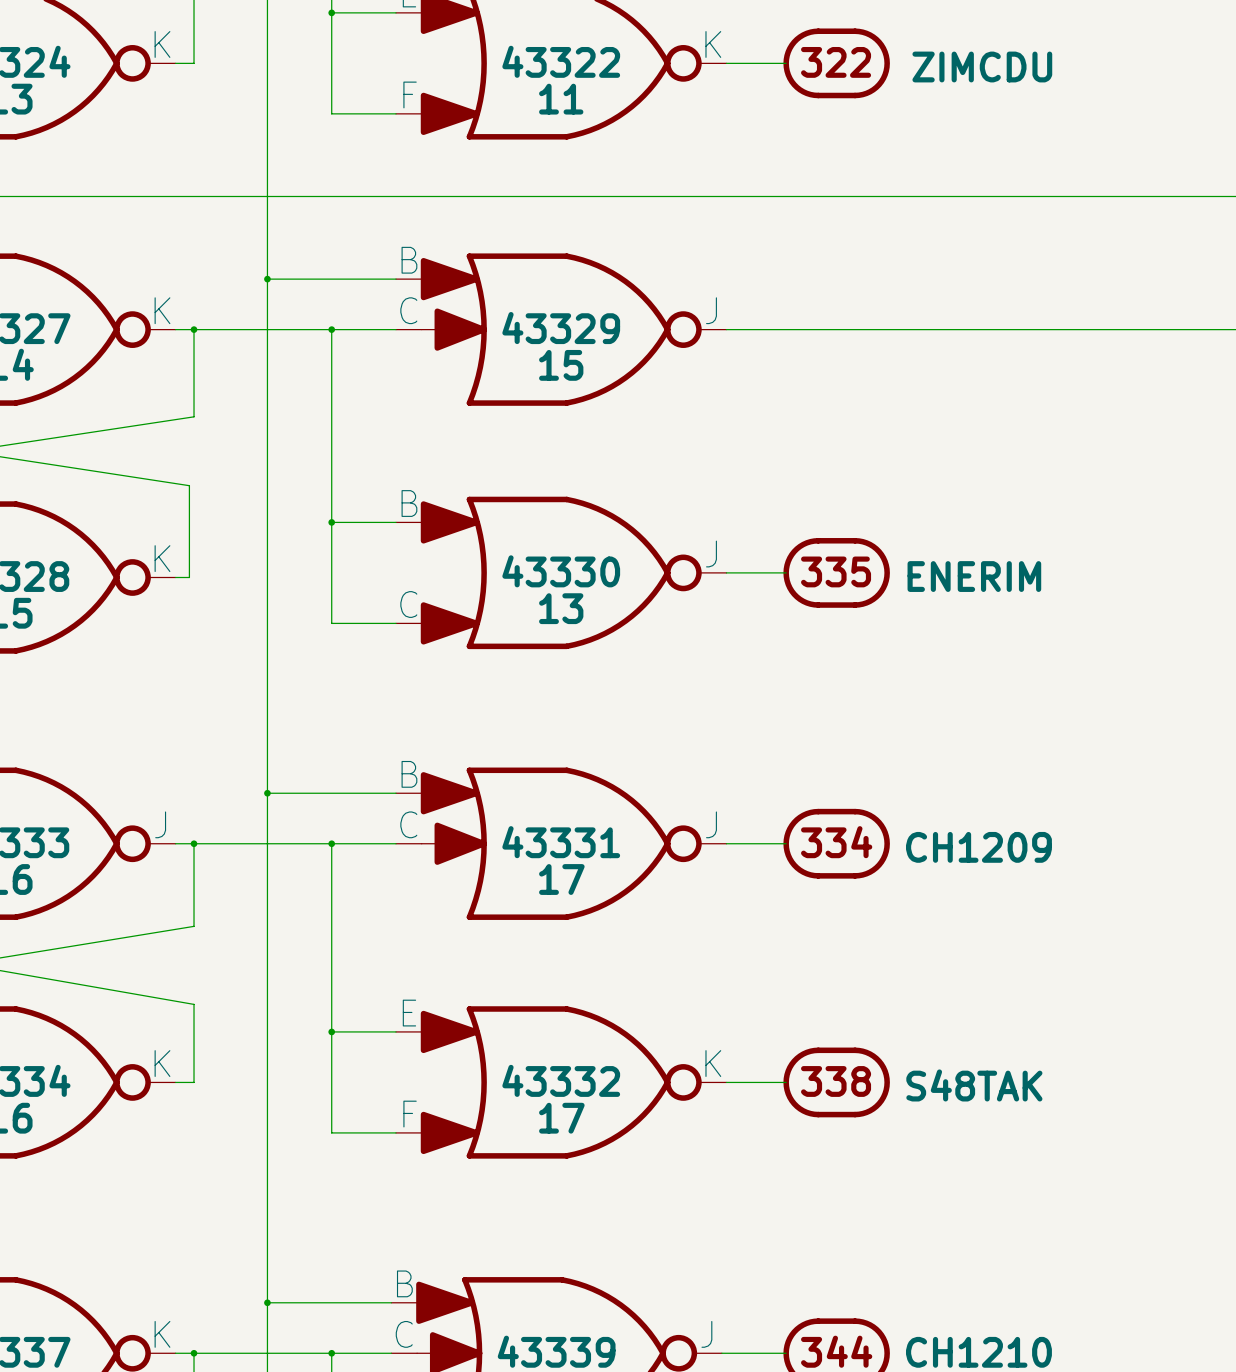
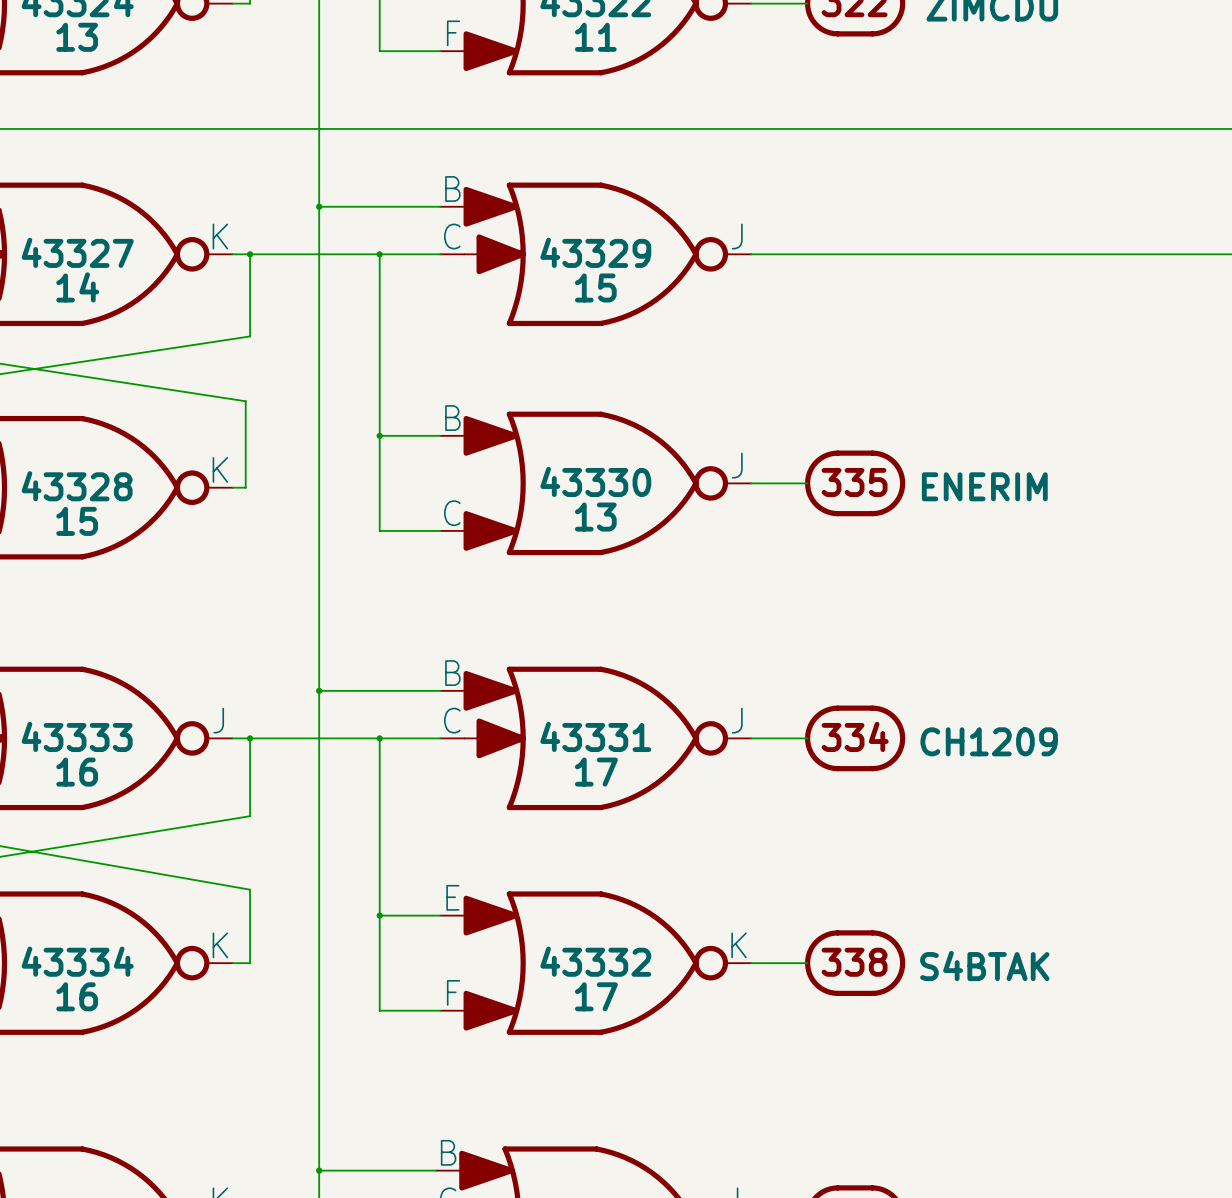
part text: S48TAK (974, 1085) -> S4BTAK (984, 965)

